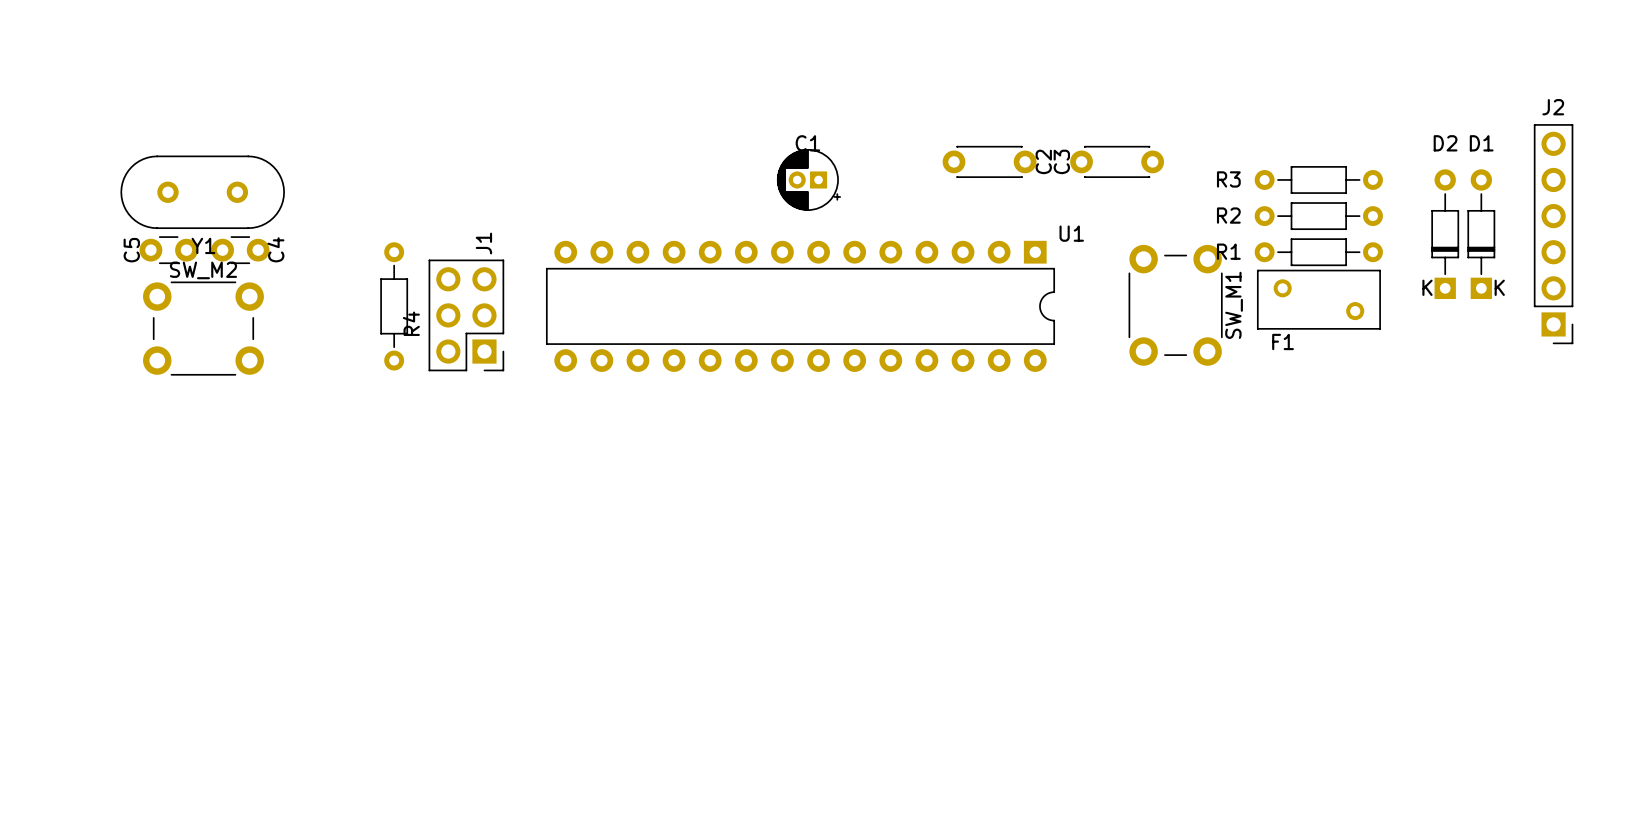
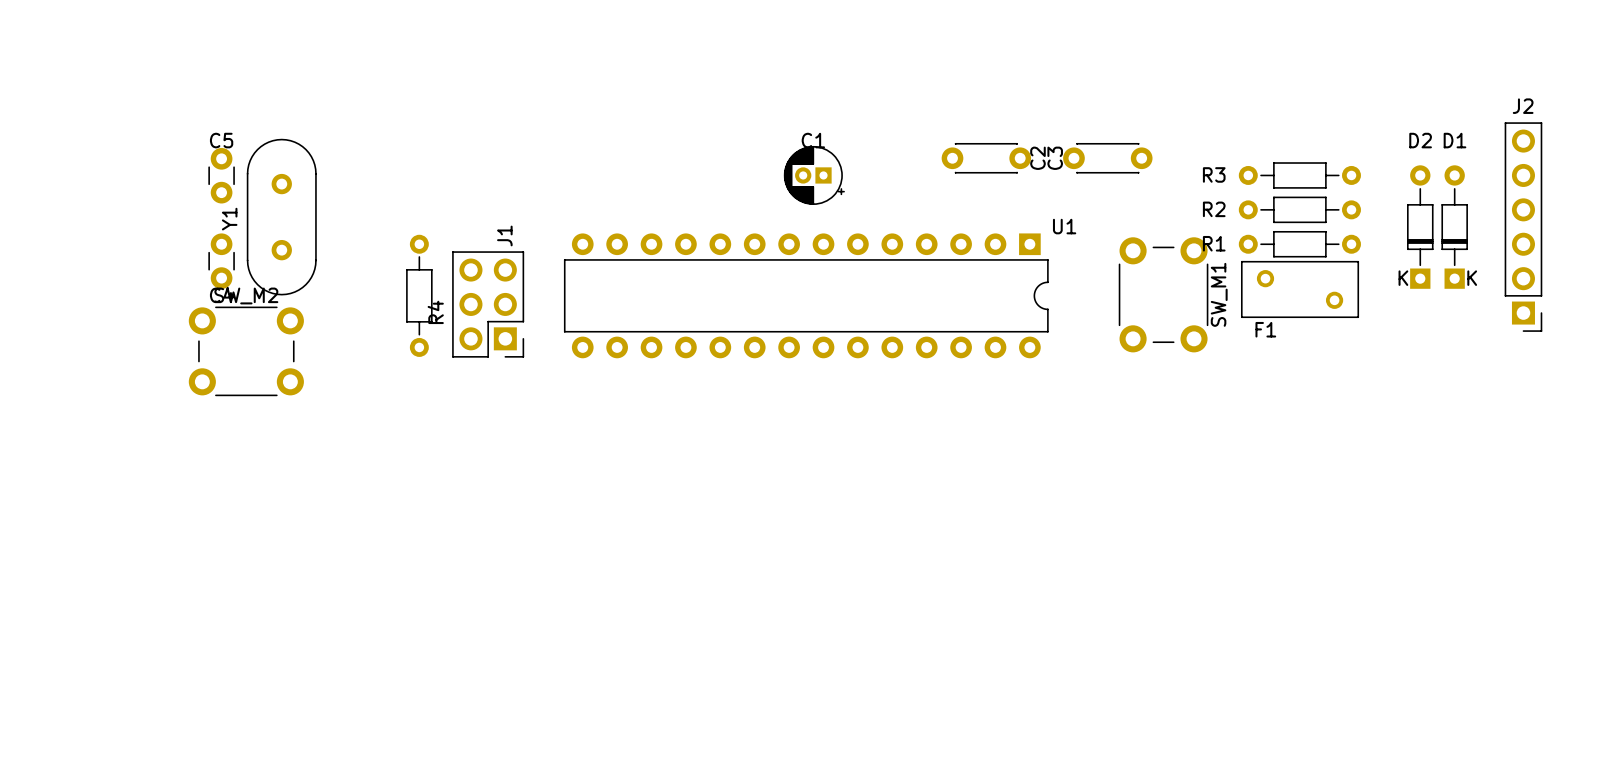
Y1 rotation: 0° (202, 192) -> 90° clockwise (281, 217)
C5 rotation: 0° (168, 250) -> 90° clockwise (221, 175)
C5 position: (168, 250) -> (221, 175)
C4 rotation: 0° (240, 250) -> 90° clockwise (221, 261)
C4 position: (240, 250) -> (221, 261)
SW_M2 position: (203, 328) -> (246, 351)

